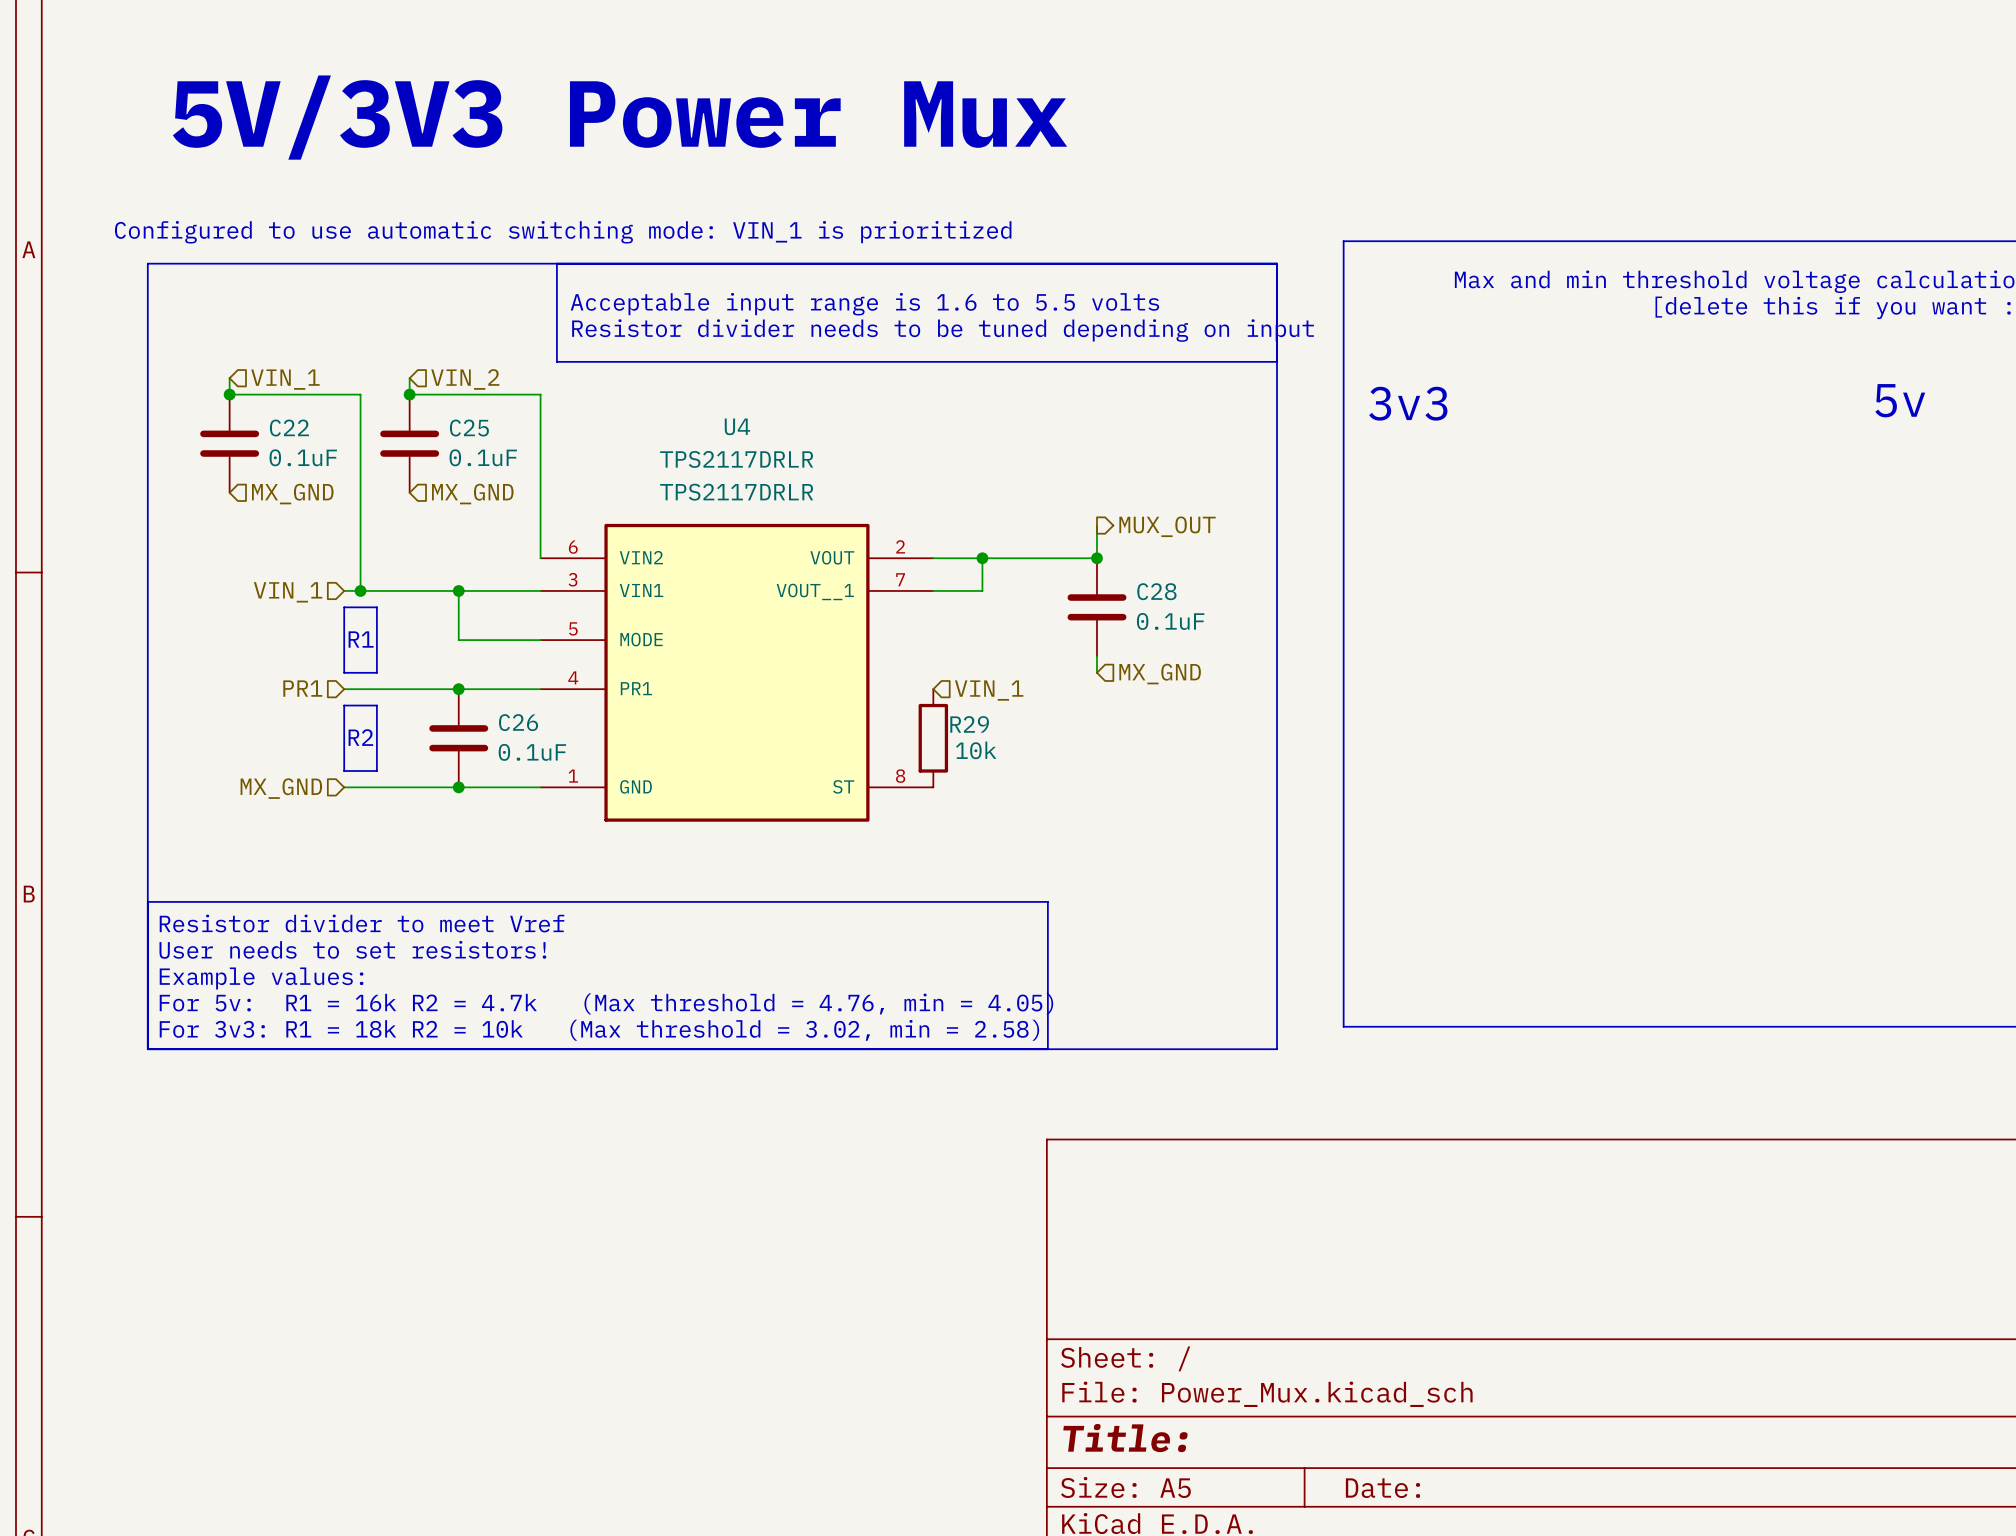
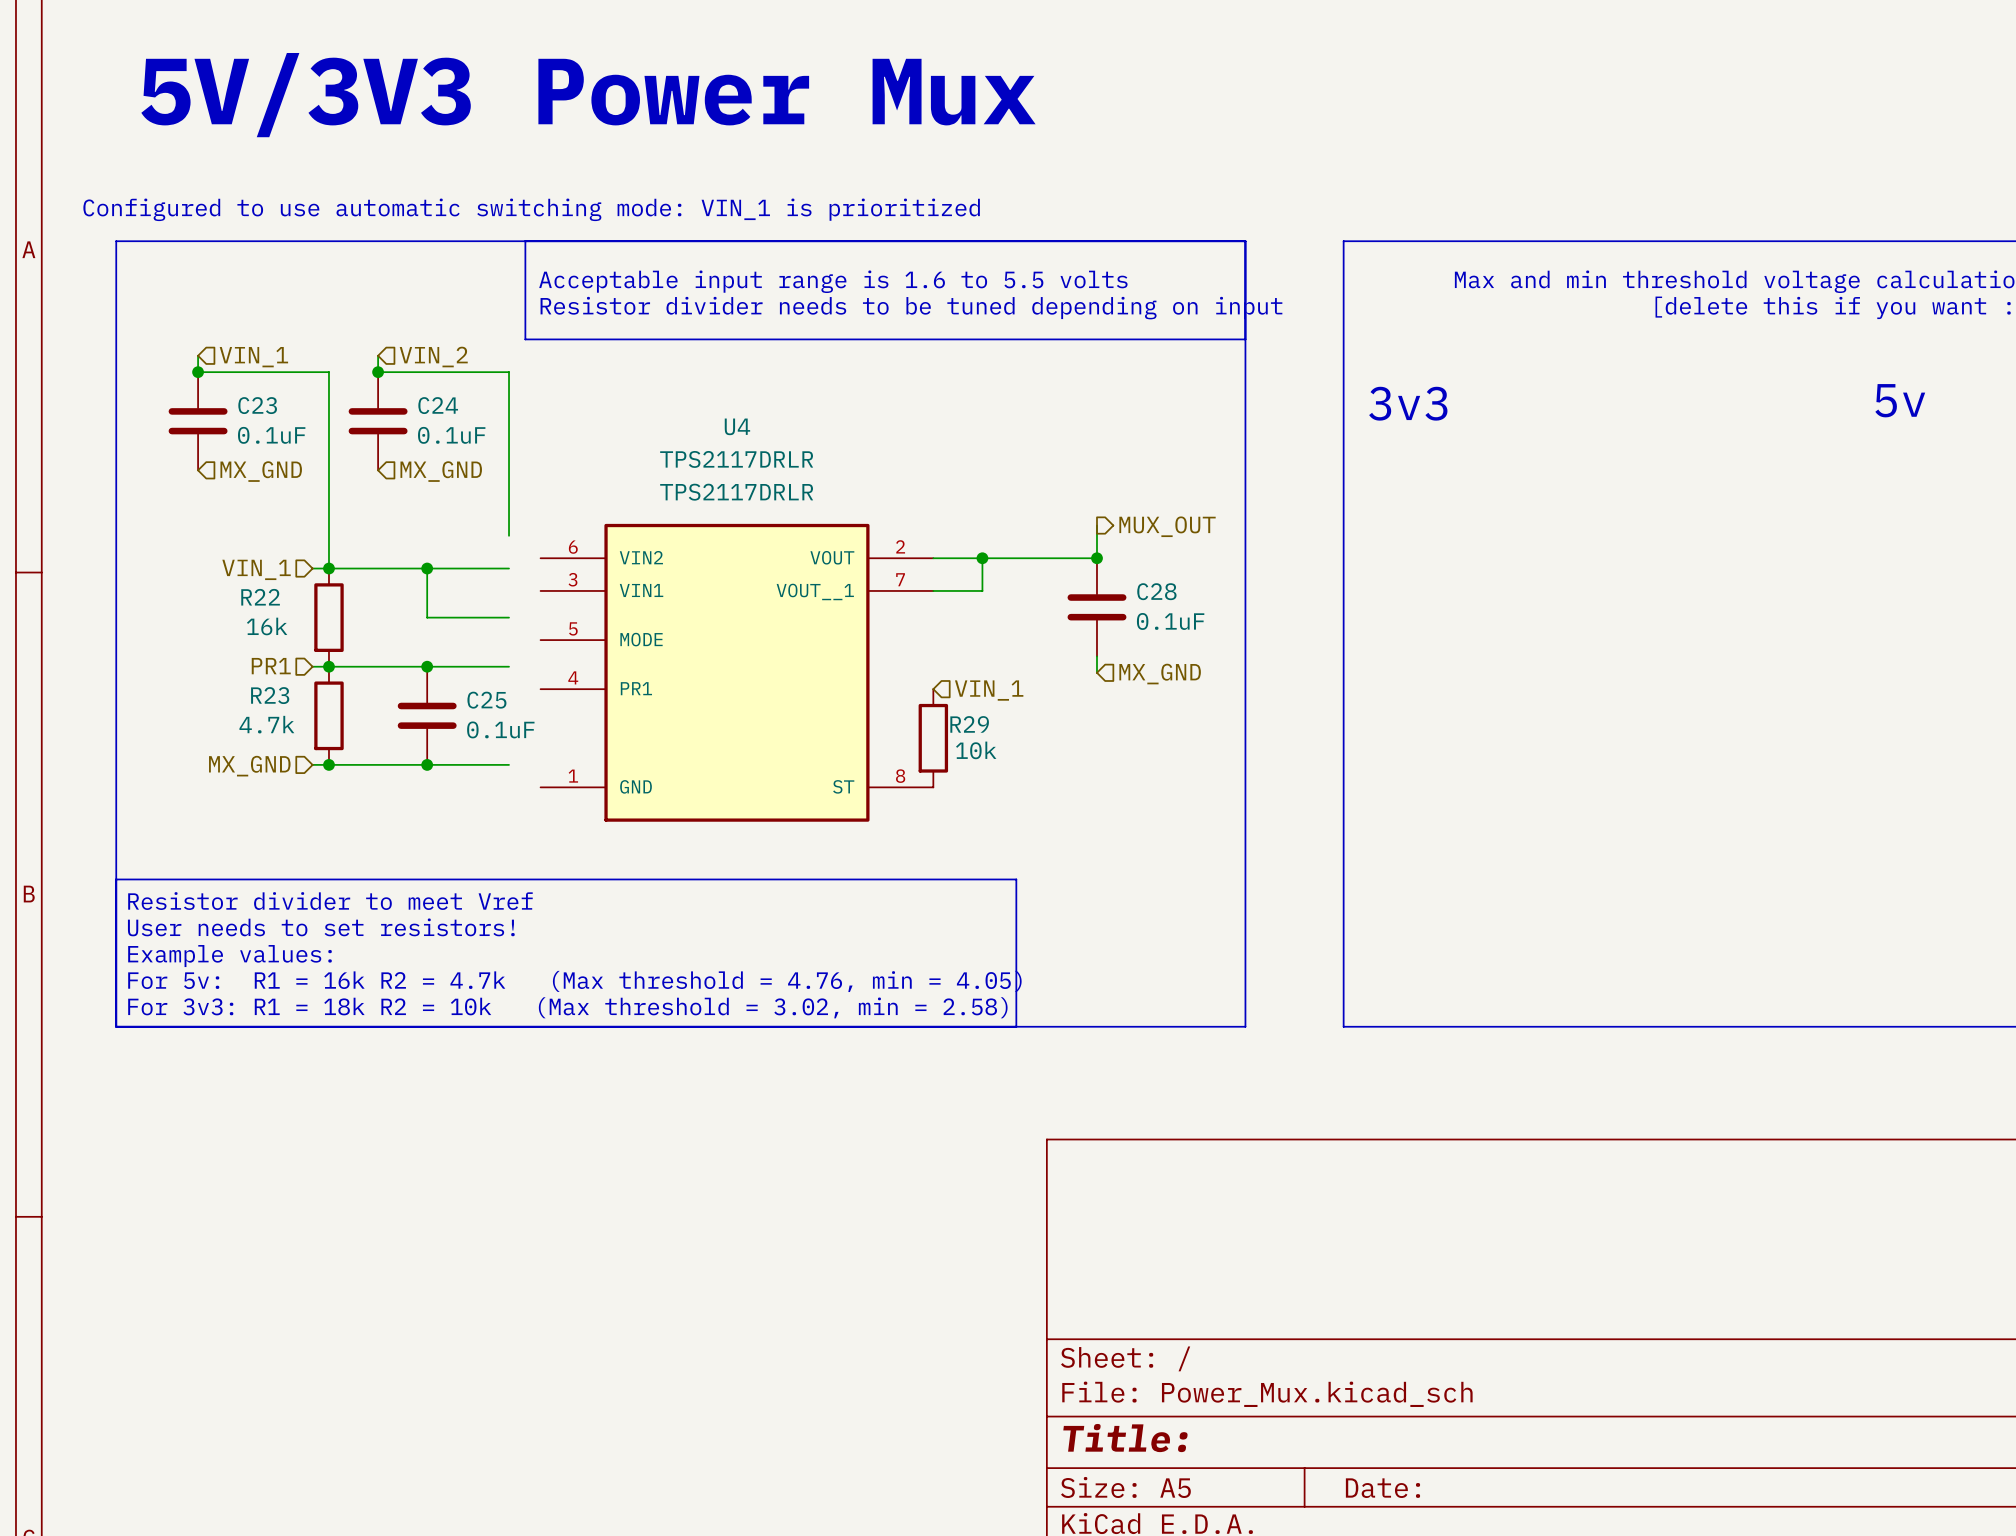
text position: 5V/3V3 Power Mux (620, 117) -> 5V/3V3 Power Mux (588, 95)
text position: Configured to use automatic switching mode: VIN_1 is prioritized (563, 232) -> Configured to use automatic switching mode: VIN_1 is prioritized (531, 209)
line: (147, 263) (147, 1049) (1277, 1049) (1277, 263) (147, 263) -> (116, 241) (116, 1026) (1245, 1026) (1245, 241) (116, 241)
line: (556, 263) (556, 361) (1277, 361) -> (525, 241) (525, 339) (1245, 339)
text position: Acceptable input range is 1.6 to 5.5 volts (864, 304) -> Acceptable input range is 1.6 to 5.5 volts (833, 281)
text position: Resistor divider needs to be tuned depending on input (943, 330) -> Resistor divider needs to be tuned depending on input (911, 308)
wire: (229, 378) (229, 394) (360, 394) (360, 590) -> (198, 355) (198, 372) (328, 372) (328, 568)
wire: (409, 378) (409, 394) (540, 394) (540, 558) -> (378, 355) (378, 372) (509, 372) (509, 535)
hierarchical label position: VIN_1 (285, 379) -> VIN_1 (253, 357)
hierarchical label position: VIN_2 (465, 379) -> VIN_2 (433, 357)
junction position: (229, 394) -> (198, 372)
junction position: (409, 394) -> (378, 372)
C23: none -> 0.1uF (198, 421)
C24: none -> 0.1uF (378, 421)
C22: 0.1uF (229, 443) -> none
C25 position: (409, 443) -> (427, 715)
hierarchical label position: MX_GND (292, 494) -> MX_GND (261, 471)
hierarchical label position: MX_GND (472, 494) -> MX_GND (441, 471)
junction: none -> (328, 568)
junction: none -> (427, 568)
wire: (344, 590) (540, 590) -> (312, 568) (509, 568)
junction: (360, 590) -> none
wire: (458, 590) (458, 640) (540, 640) -> (427, 568) (427, 617) (509, 617)
junction: (458, 590) -> none
hierarchical label position: VIN_1 (288, 592) -> VIN_1 (256, 569)
line: (344, 607) (376, 607) (376, 672) (344, 672) (344, 607) -> none
R22: none -> 16k (328, 617)
text: R1 (361, 639) -> none
junction: none -> (328, 666)
hierarchical label position: PR1 (302, 688) -> PR1 (271, 666)
wire: (344, 689) (540, 689) -> (312, 666) (509, 666)
junction position: (458, 689) -> (427, 666)
line: (344, 705) (344, 771) (376, 771) (376, 705) (344, 705) -> none
R23: none -> 4.7k (328, 715)
text: R2 (360, 737) -> none
C26: 0.1uF (458, 738) -> none
junction: none -> (328, 764)
wire: (344, 787) (540, 787) -> (312, 764) (509, 764)
junction position: (458, 787) -> (427, 764)
hierarchical label position: MX_GND (281, 788) -> MX_GND (249, 766)
line: (147, 901) (1047, 901) (1047, 1049) -> (116, 879) (1016, 879) (1016, 1026)
text position: Resistor divider to meet Vref (362, 923) -> Resistor divider to meet Vref (330, 901)
text position: User needs to set resistors! (352, 949) -> User needs to set resistors! (321, 927)
text position: Example values: (261, 978) -> Example values: (229, 956)
text position: For 5v: R1 = 16k R2 = 4.7k (Max threshold = 4.76, min = 4.05) (606, 1003) -> For 5v: R1 = 16k R2 = 4.7k (Max threshold = 4.76, min = 4.05) (574, 981)
text position: For 3v3: R1 = 18k R2 = 10k (Max threshold = 3.02, min = 2.58) (599, 1030) -> For 3v3: R1 = 18k R2 = 10k (Max threshold = 3.02, min = 2.58) (567, 1007)

